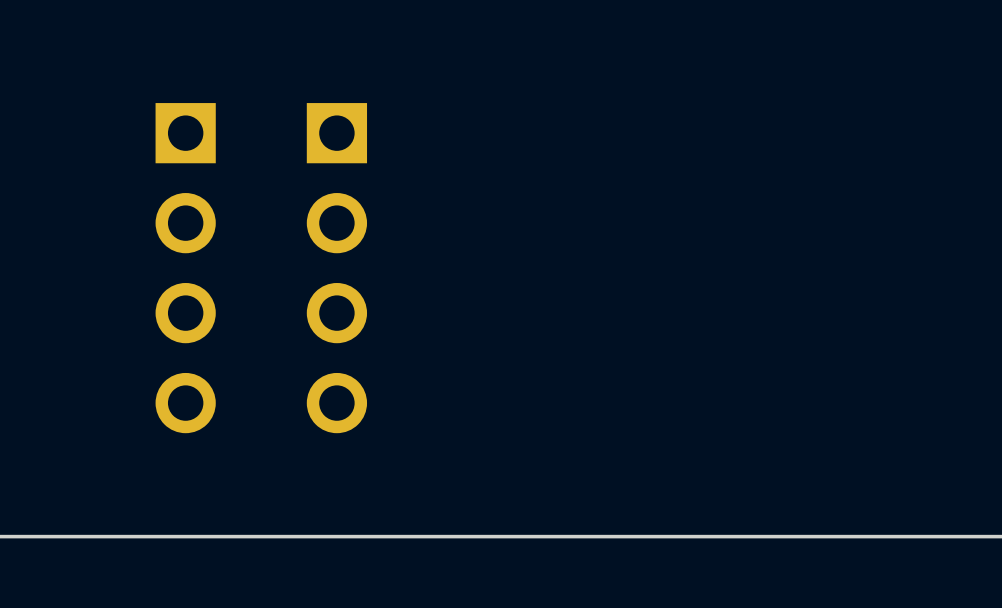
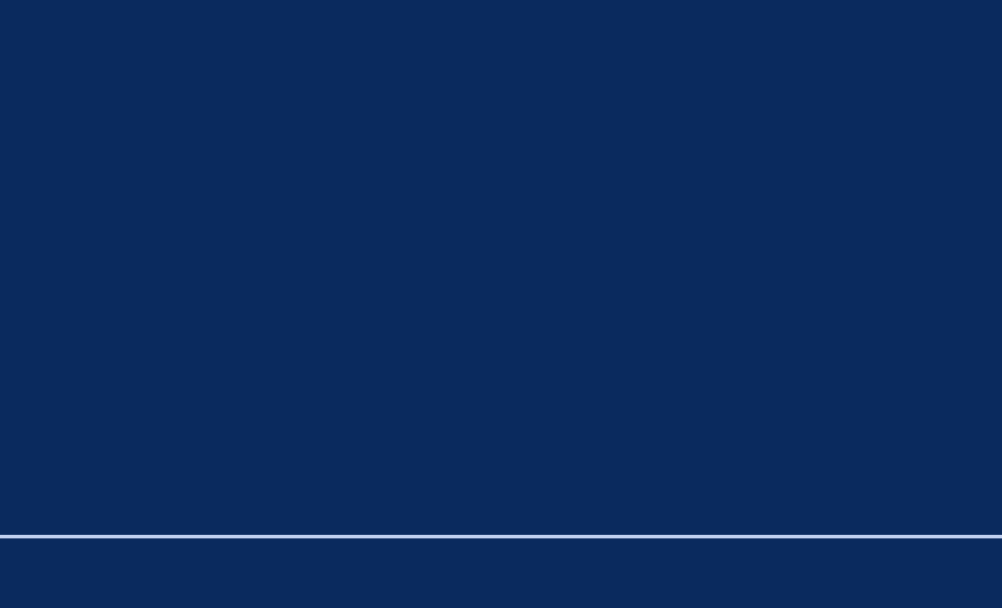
part: (185, 268) -> none
part: (336, 268) -> none

